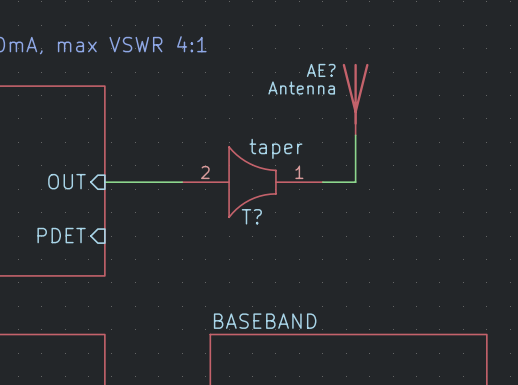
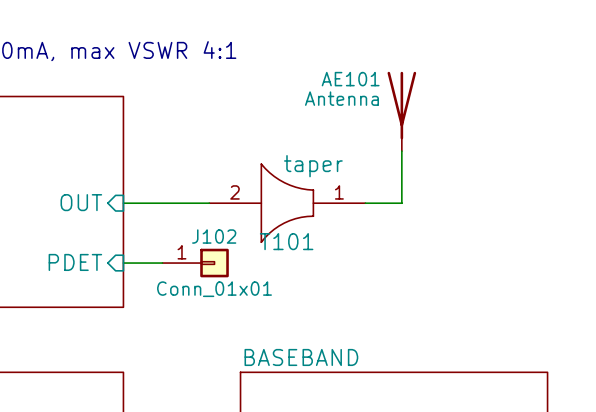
AE? name: AE? (321, 70) -> AE101 (350, 79)
T? name: T? (251, 216) -> T101 (286, 241)
wire: none -> (123, 263) (162, 263)
J102: none -> Conn_01x01 (195, 263)

